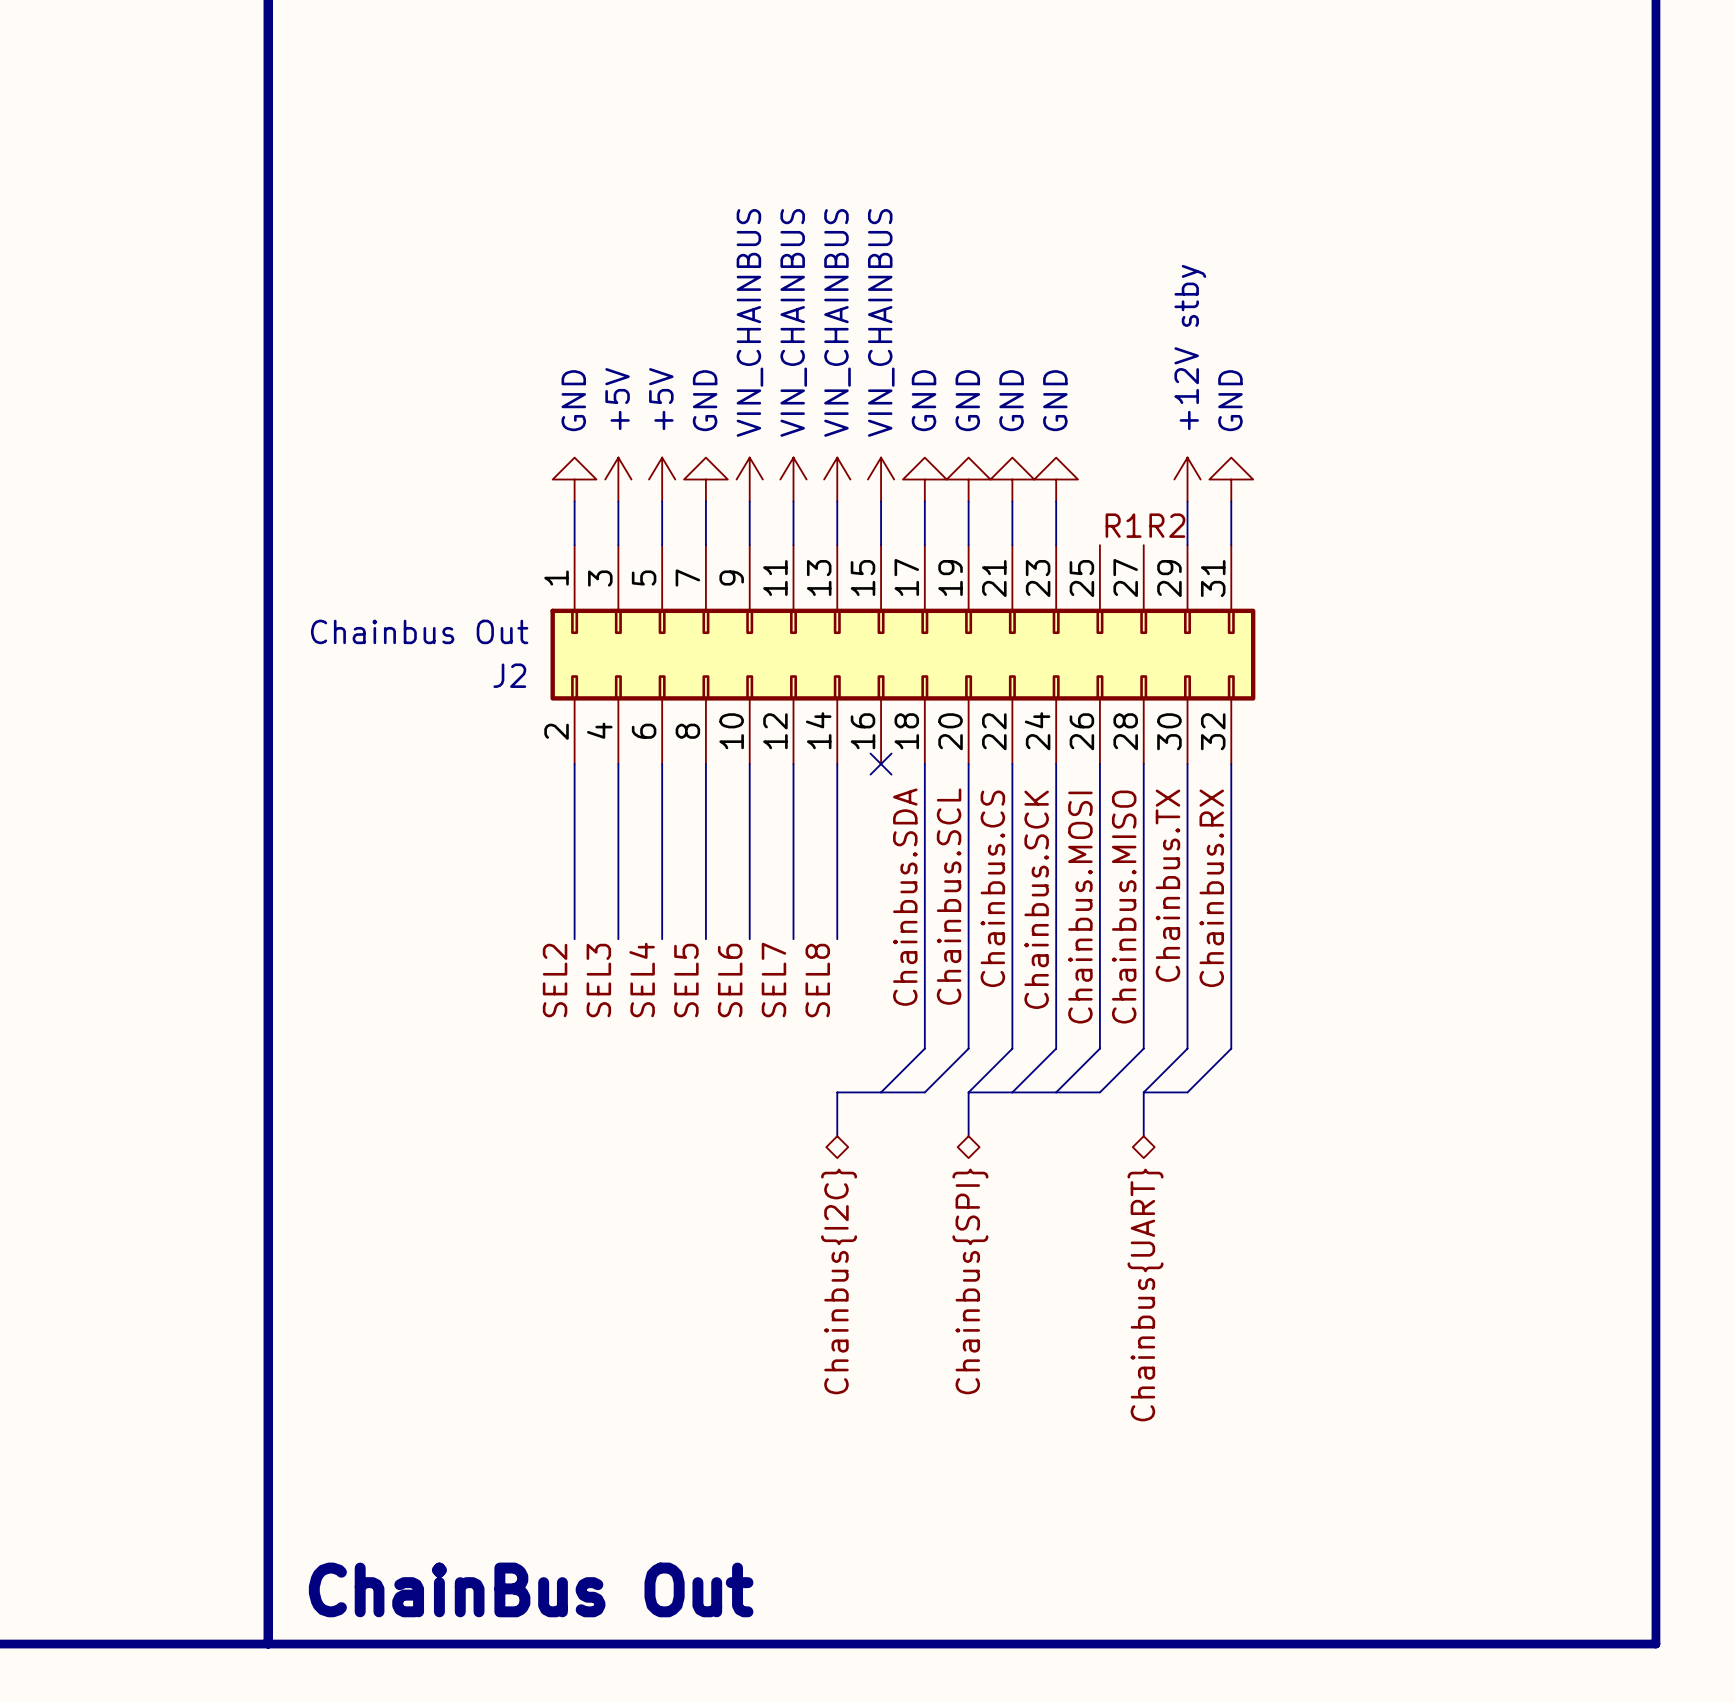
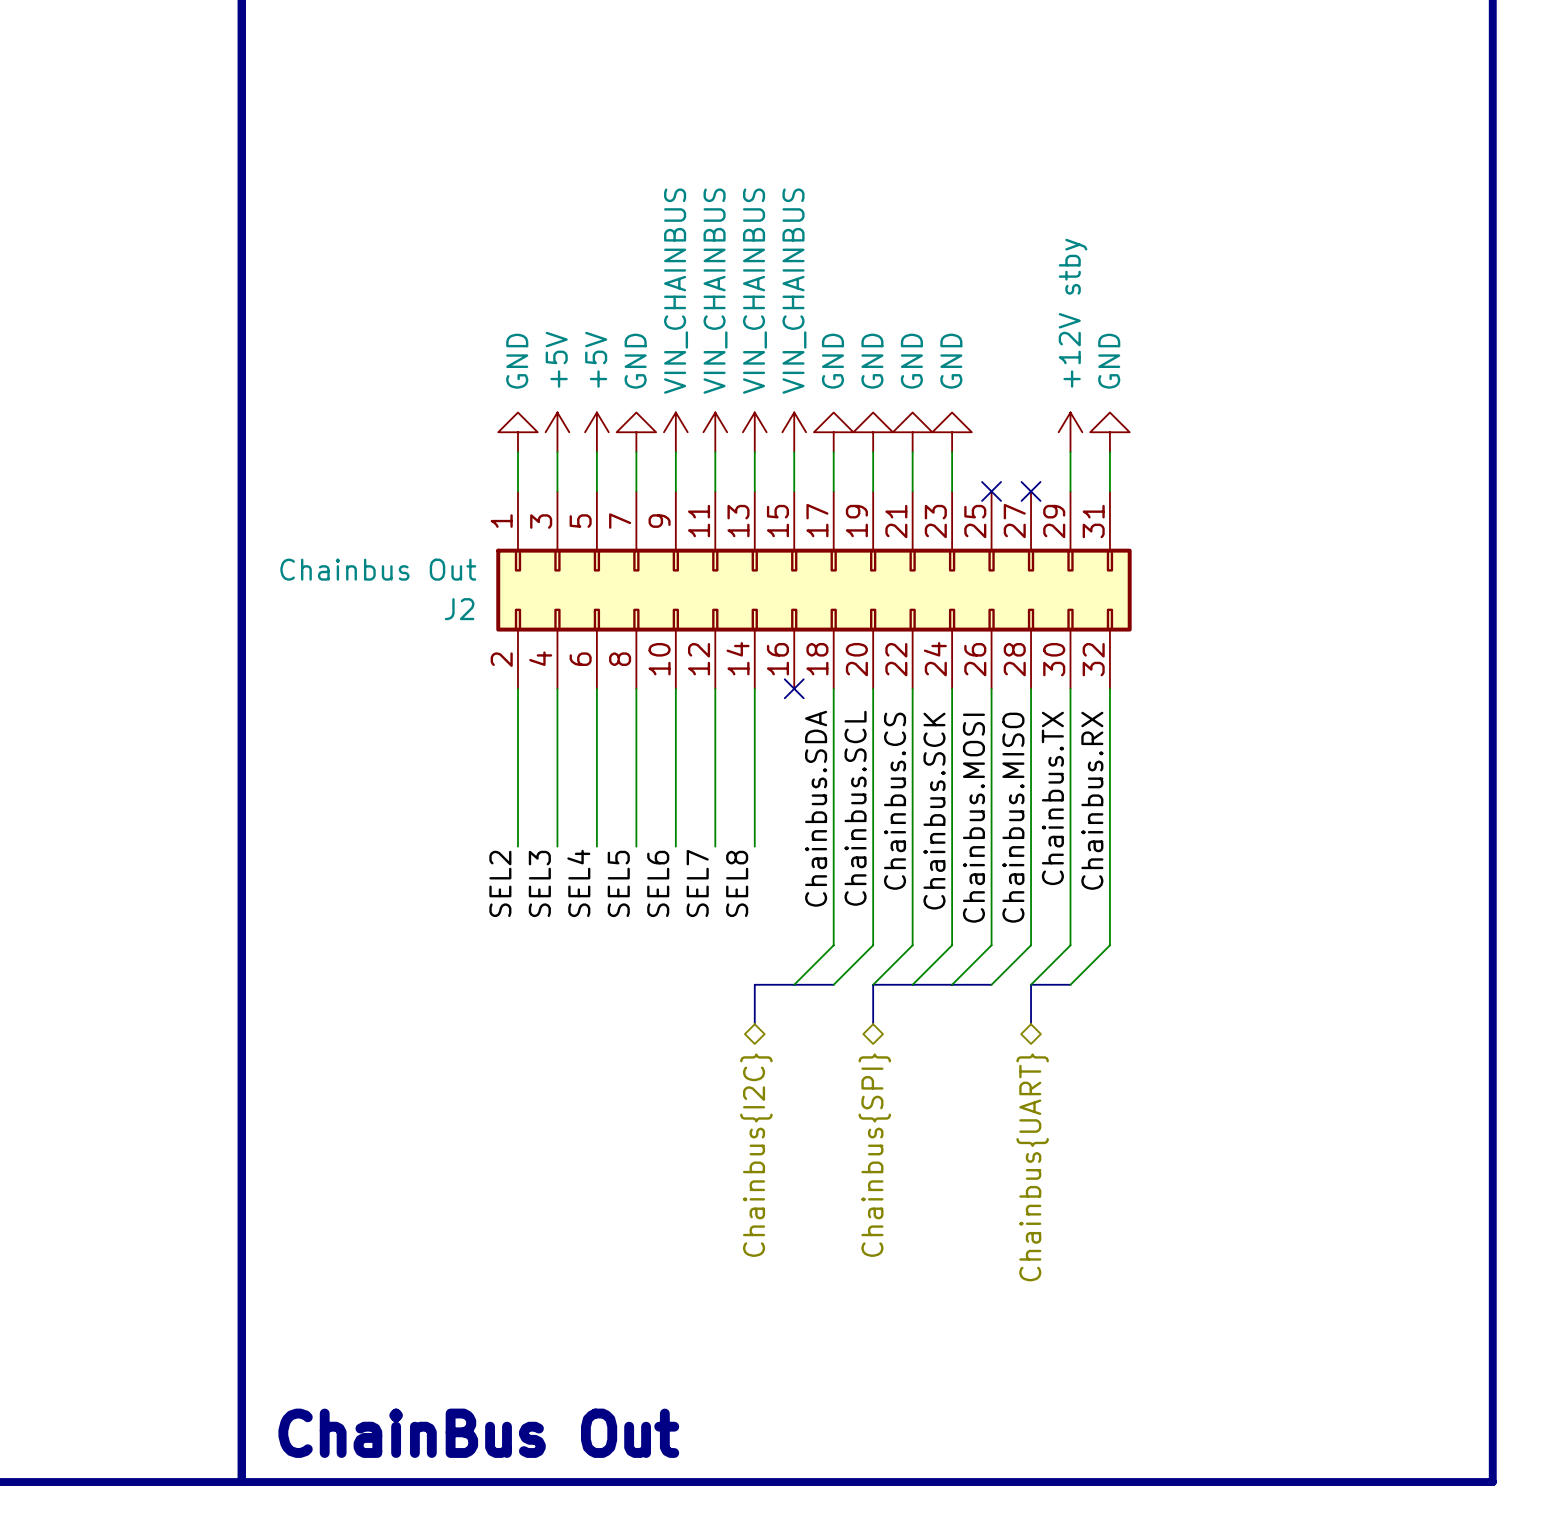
label: R1 (1123, 525) -> none
label: R2 (1167, 525) -> none
no-connect mark: none -> (991, 491)
no-connect mark: none -> (1031, 491)

